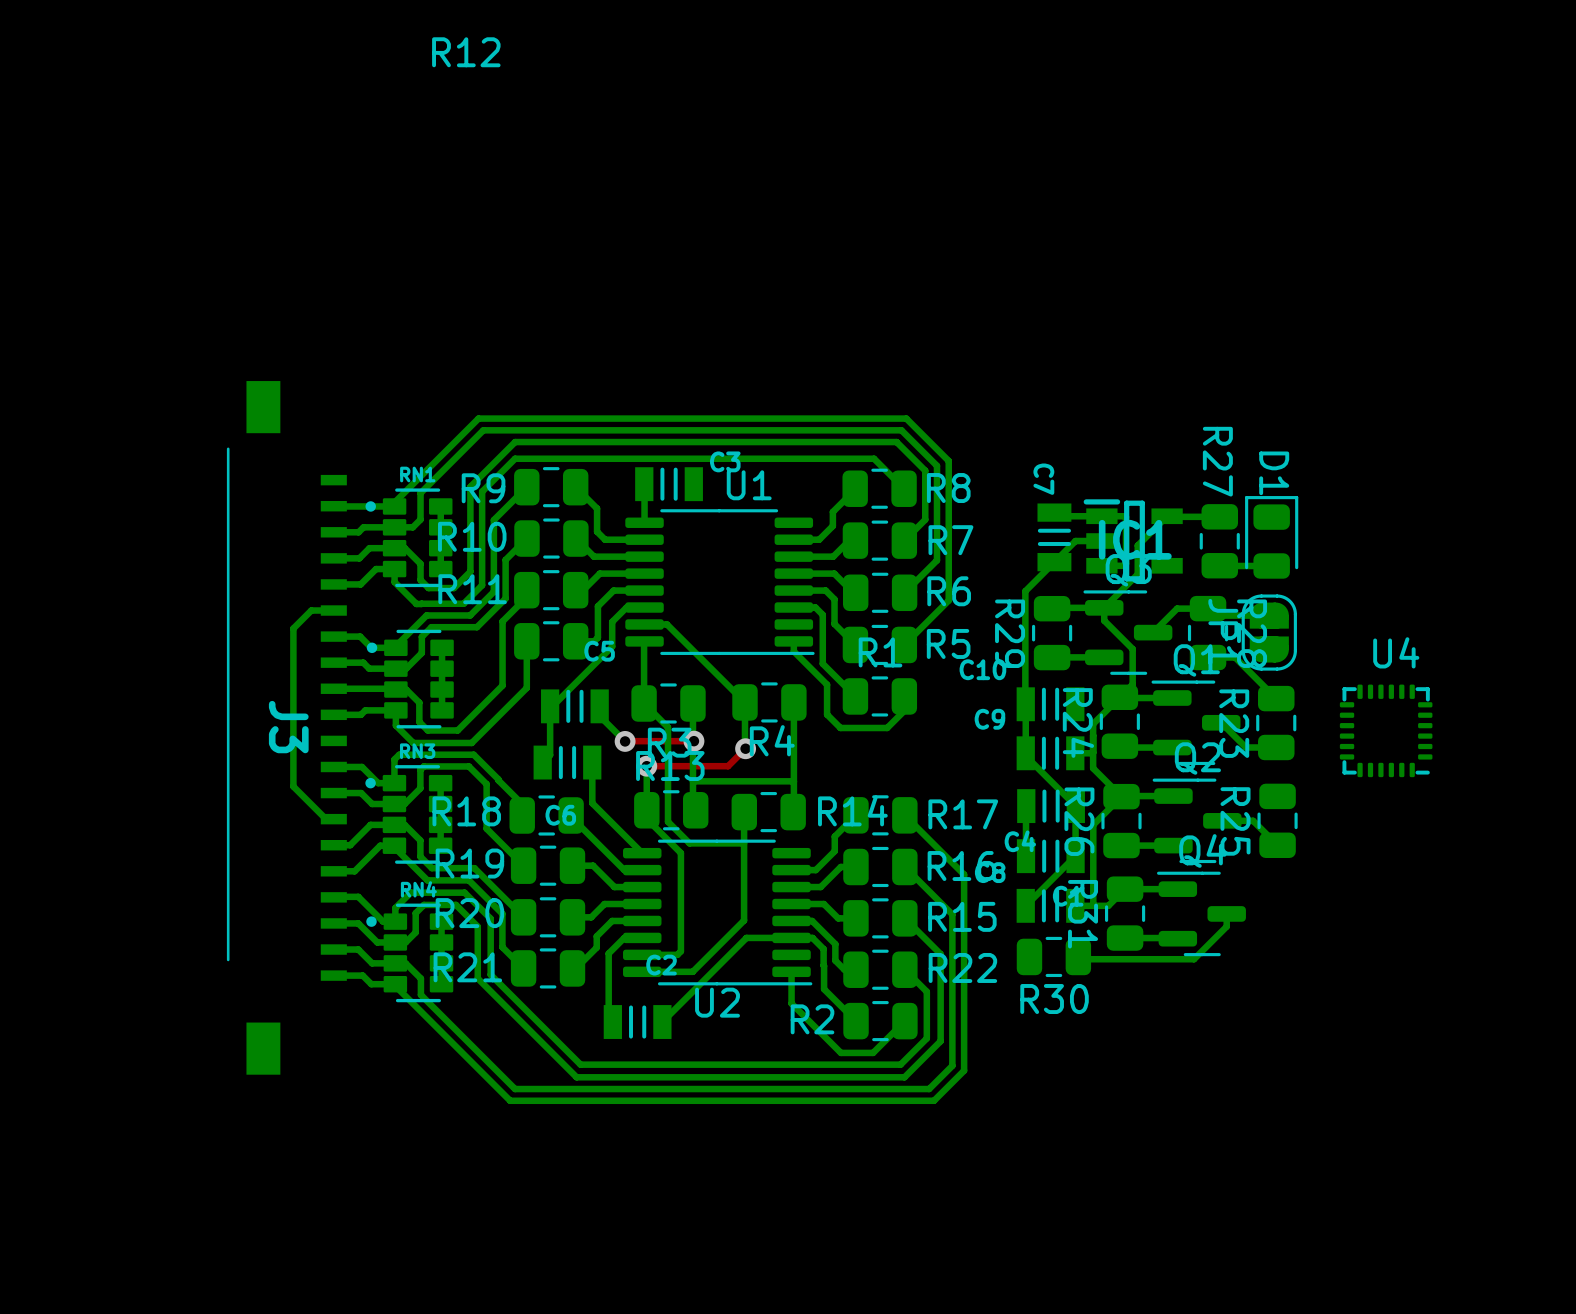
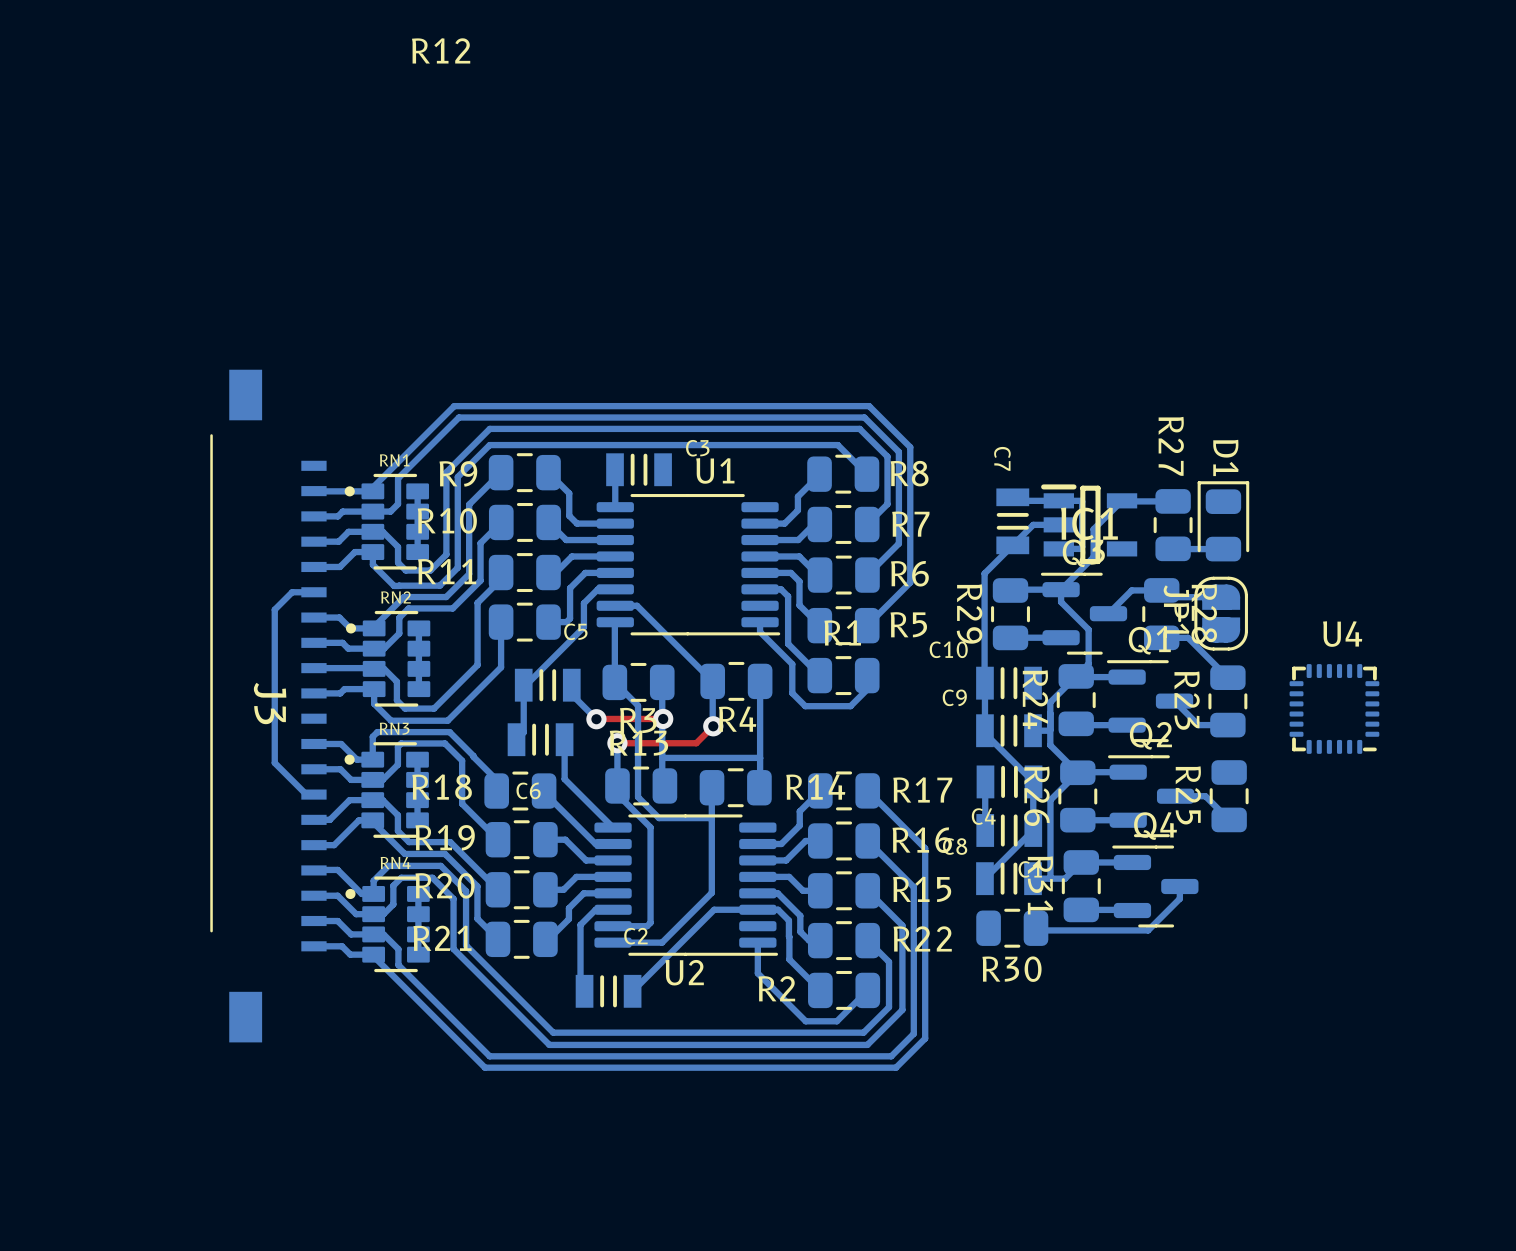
RN2 name: none -> RN2 (396, 597)

